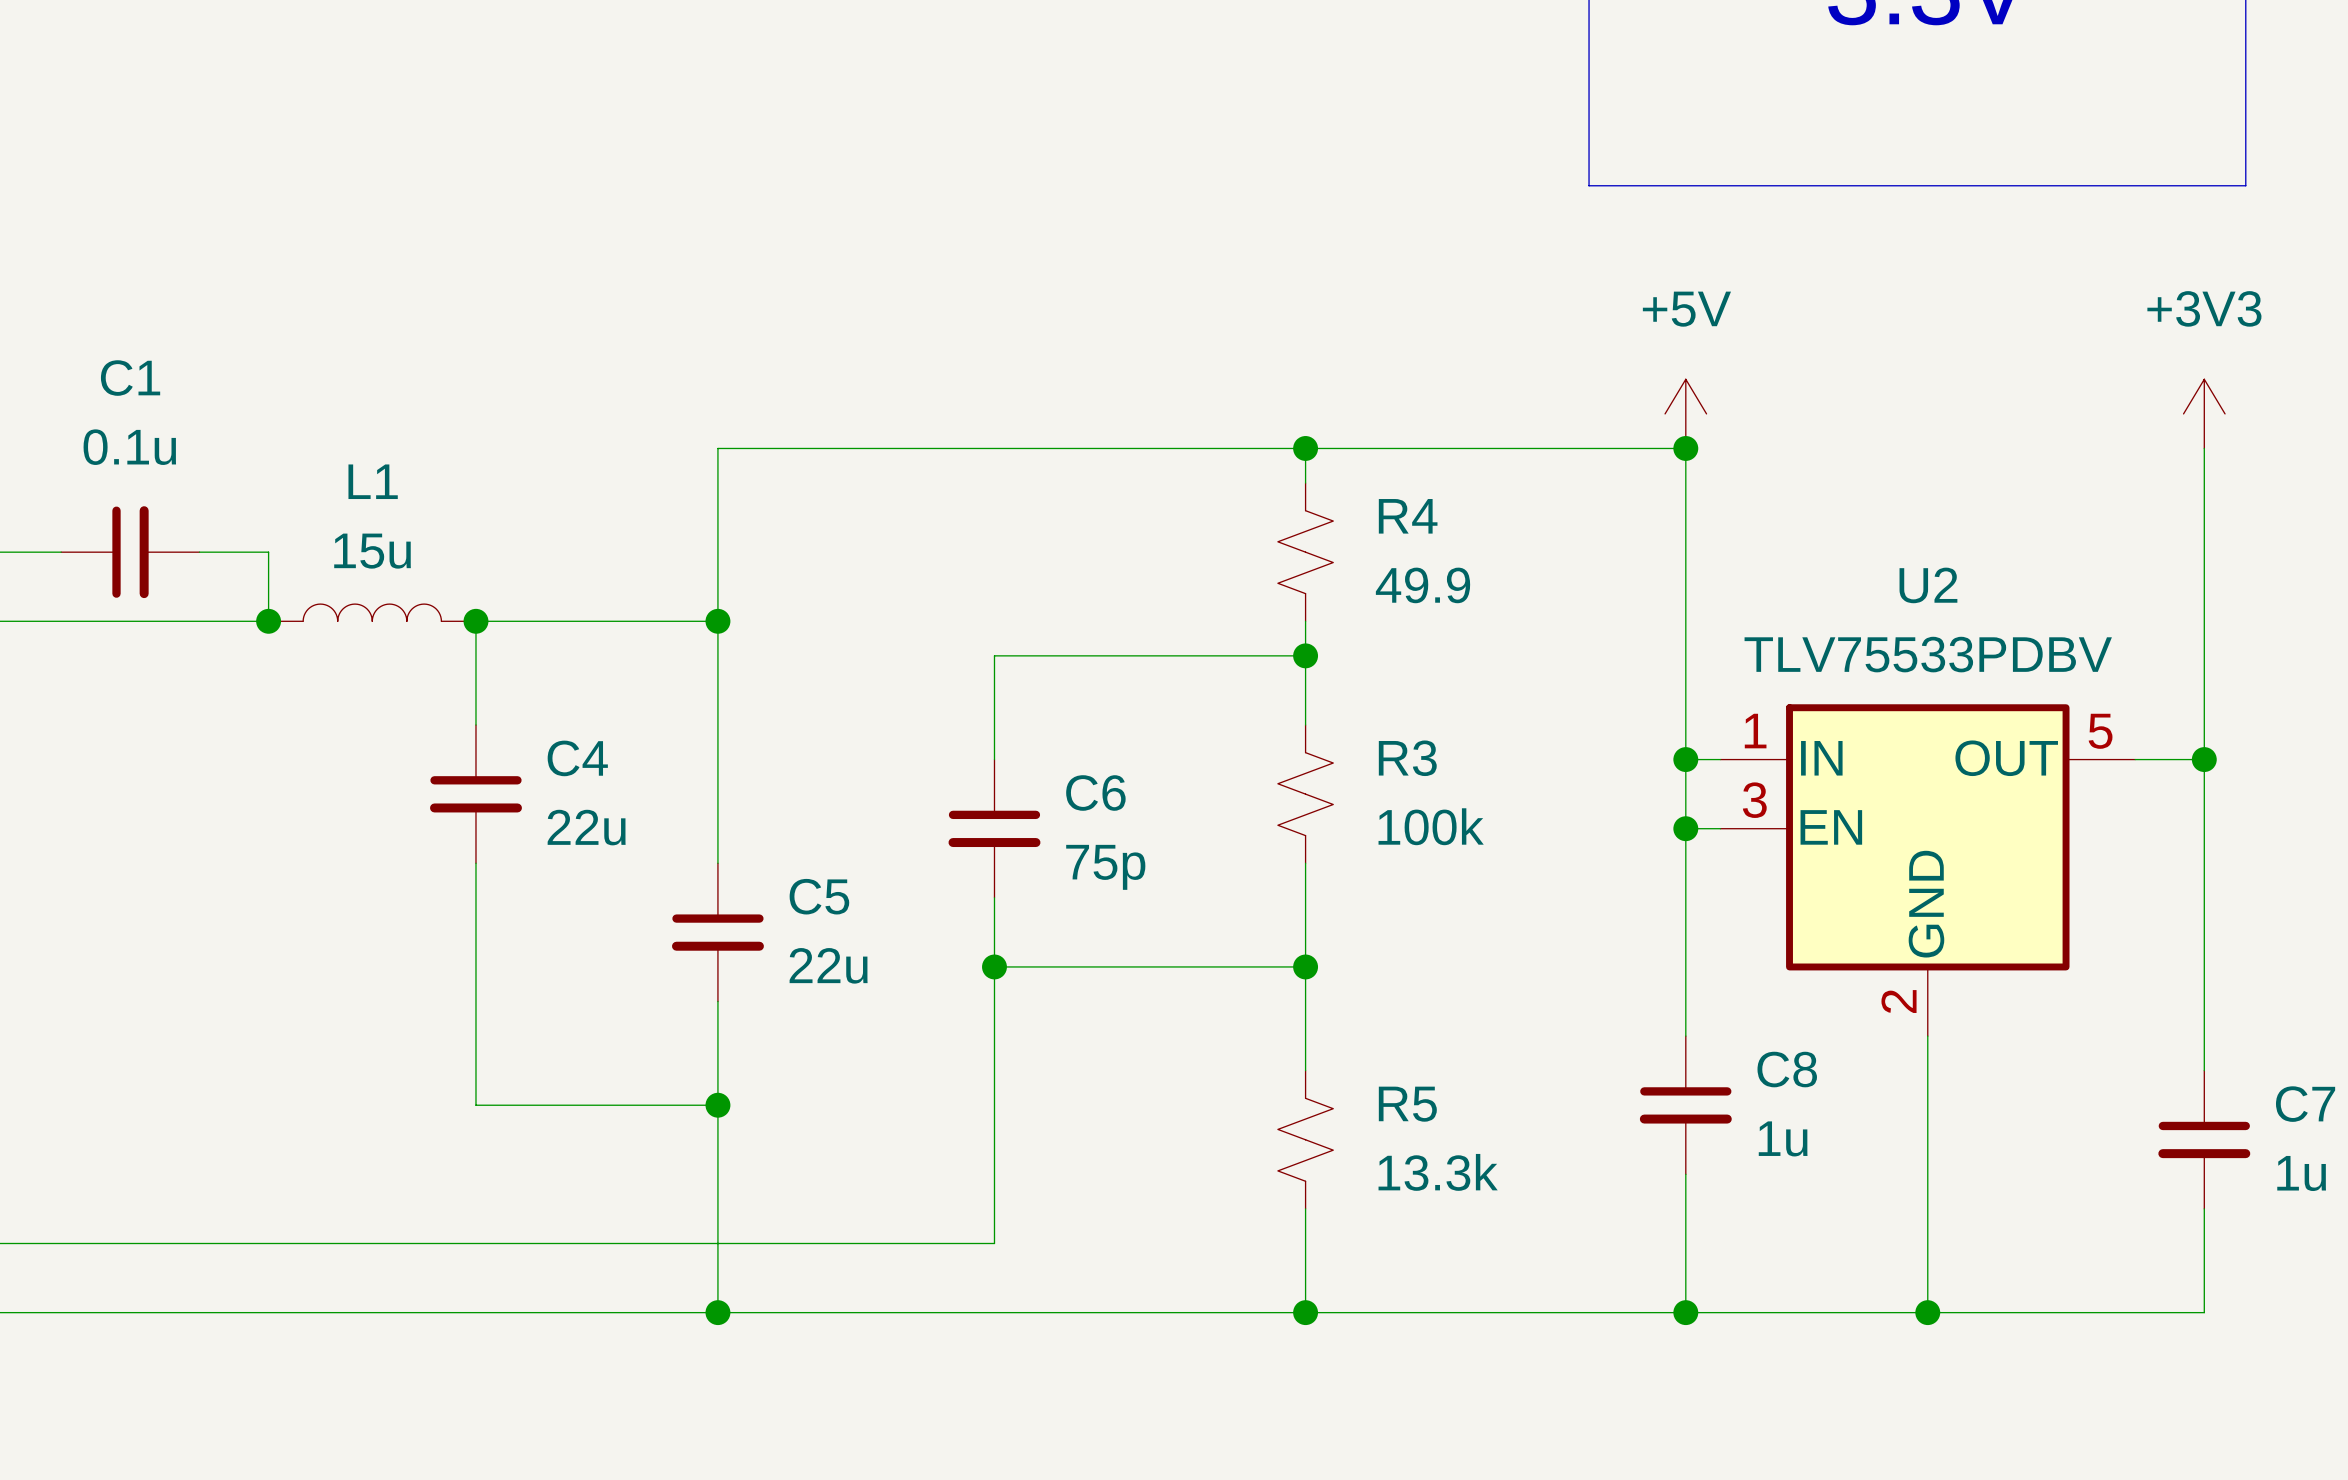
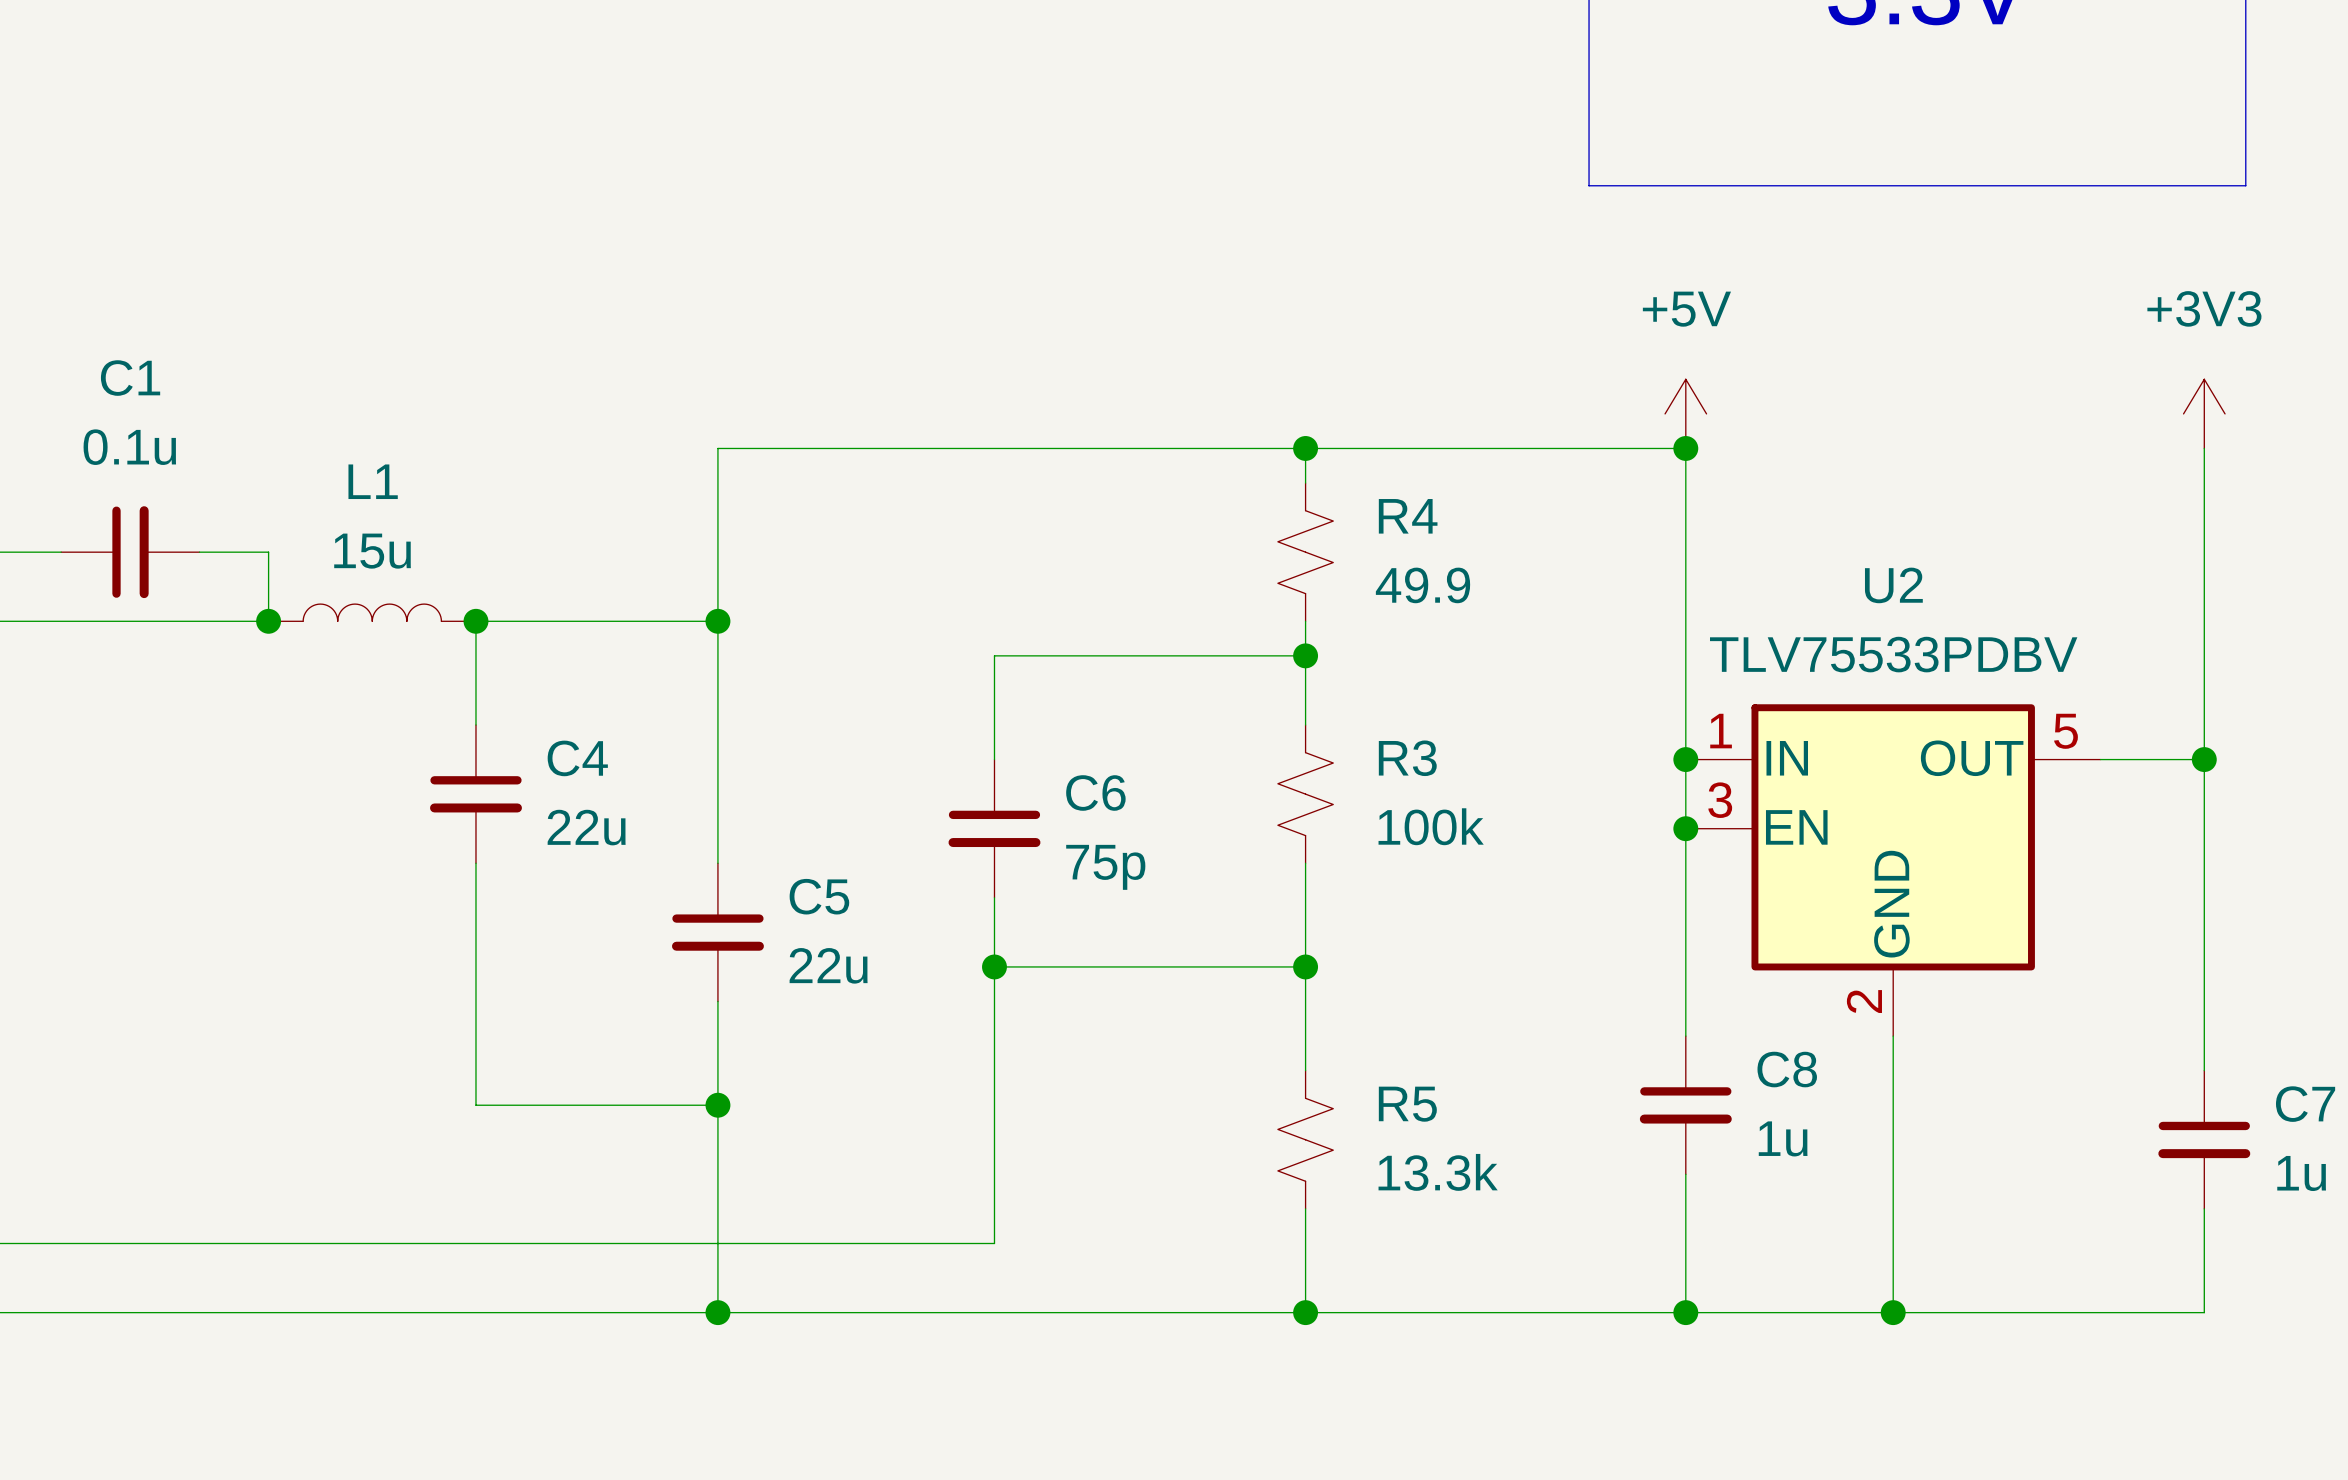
U2 position: (1927, 870) -> (1893, 870)
wire: (1927, 1036) (1927, 1312) -> (1893, 1036) (1893, 1312)
junction position: (1927, 1312) -> (1893, 1312)

